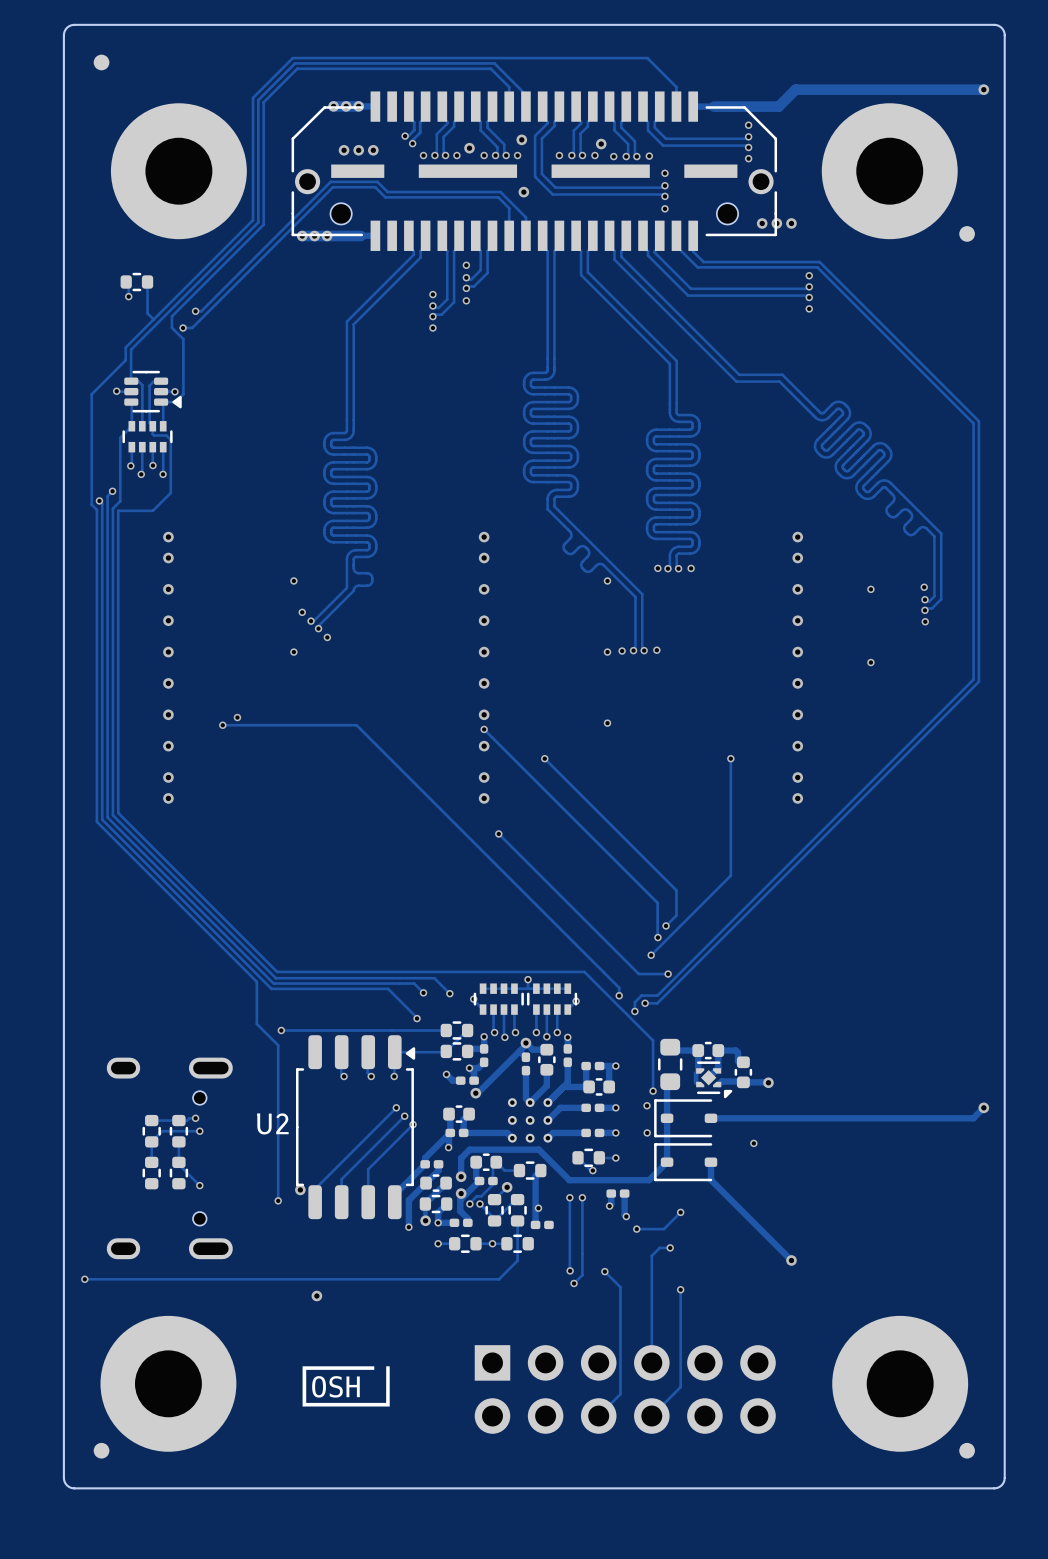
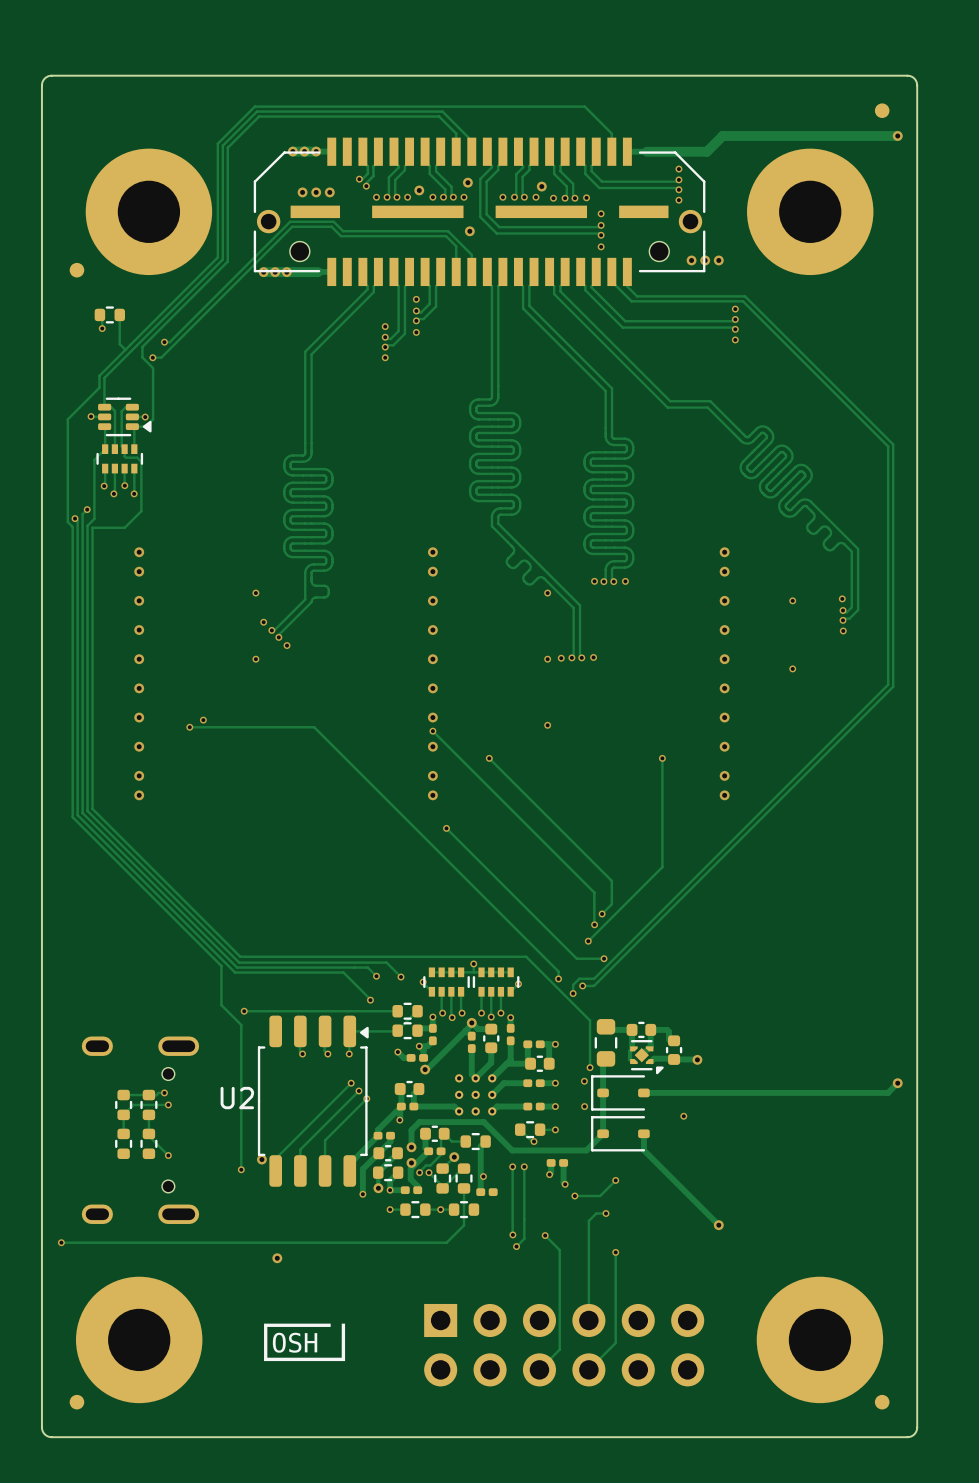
part position: (101, 62) -> (76, 270)
part position: (967, 233) -> (882, 110)

